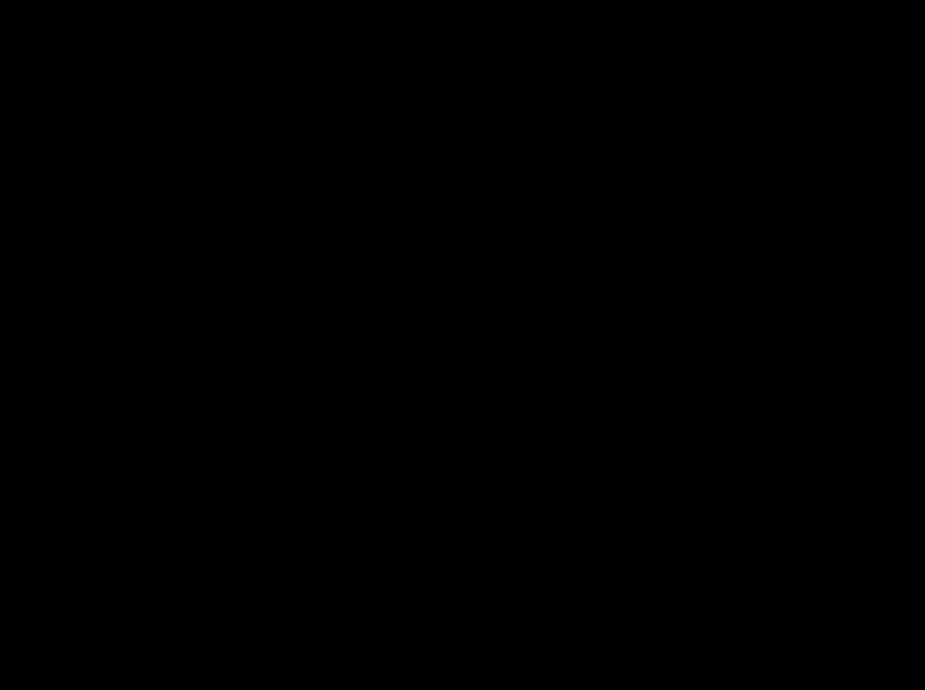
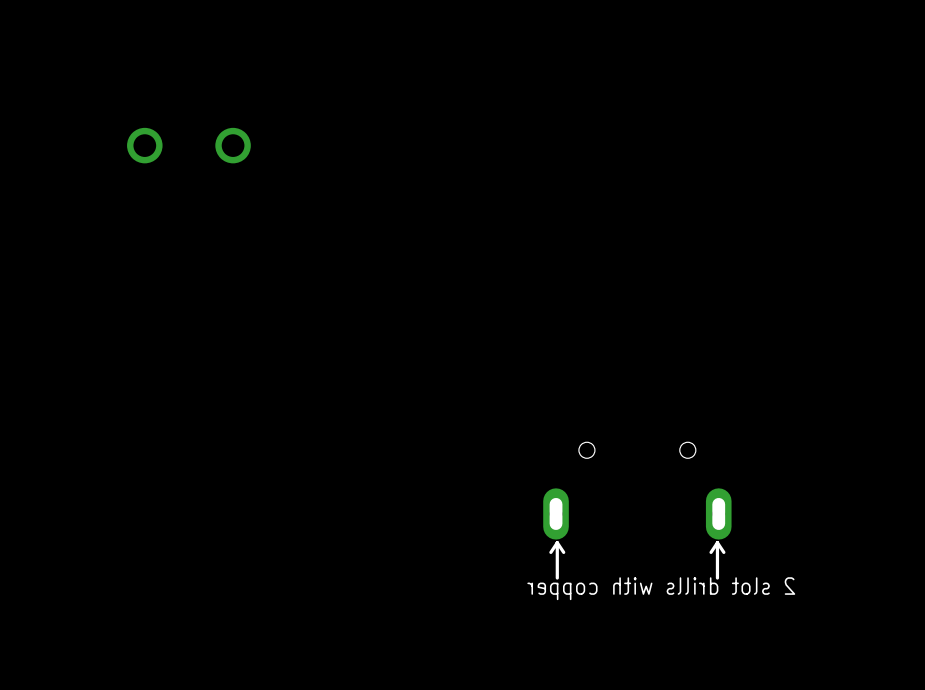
part: none -> (188, 145)
part: none -> (637, 510)

